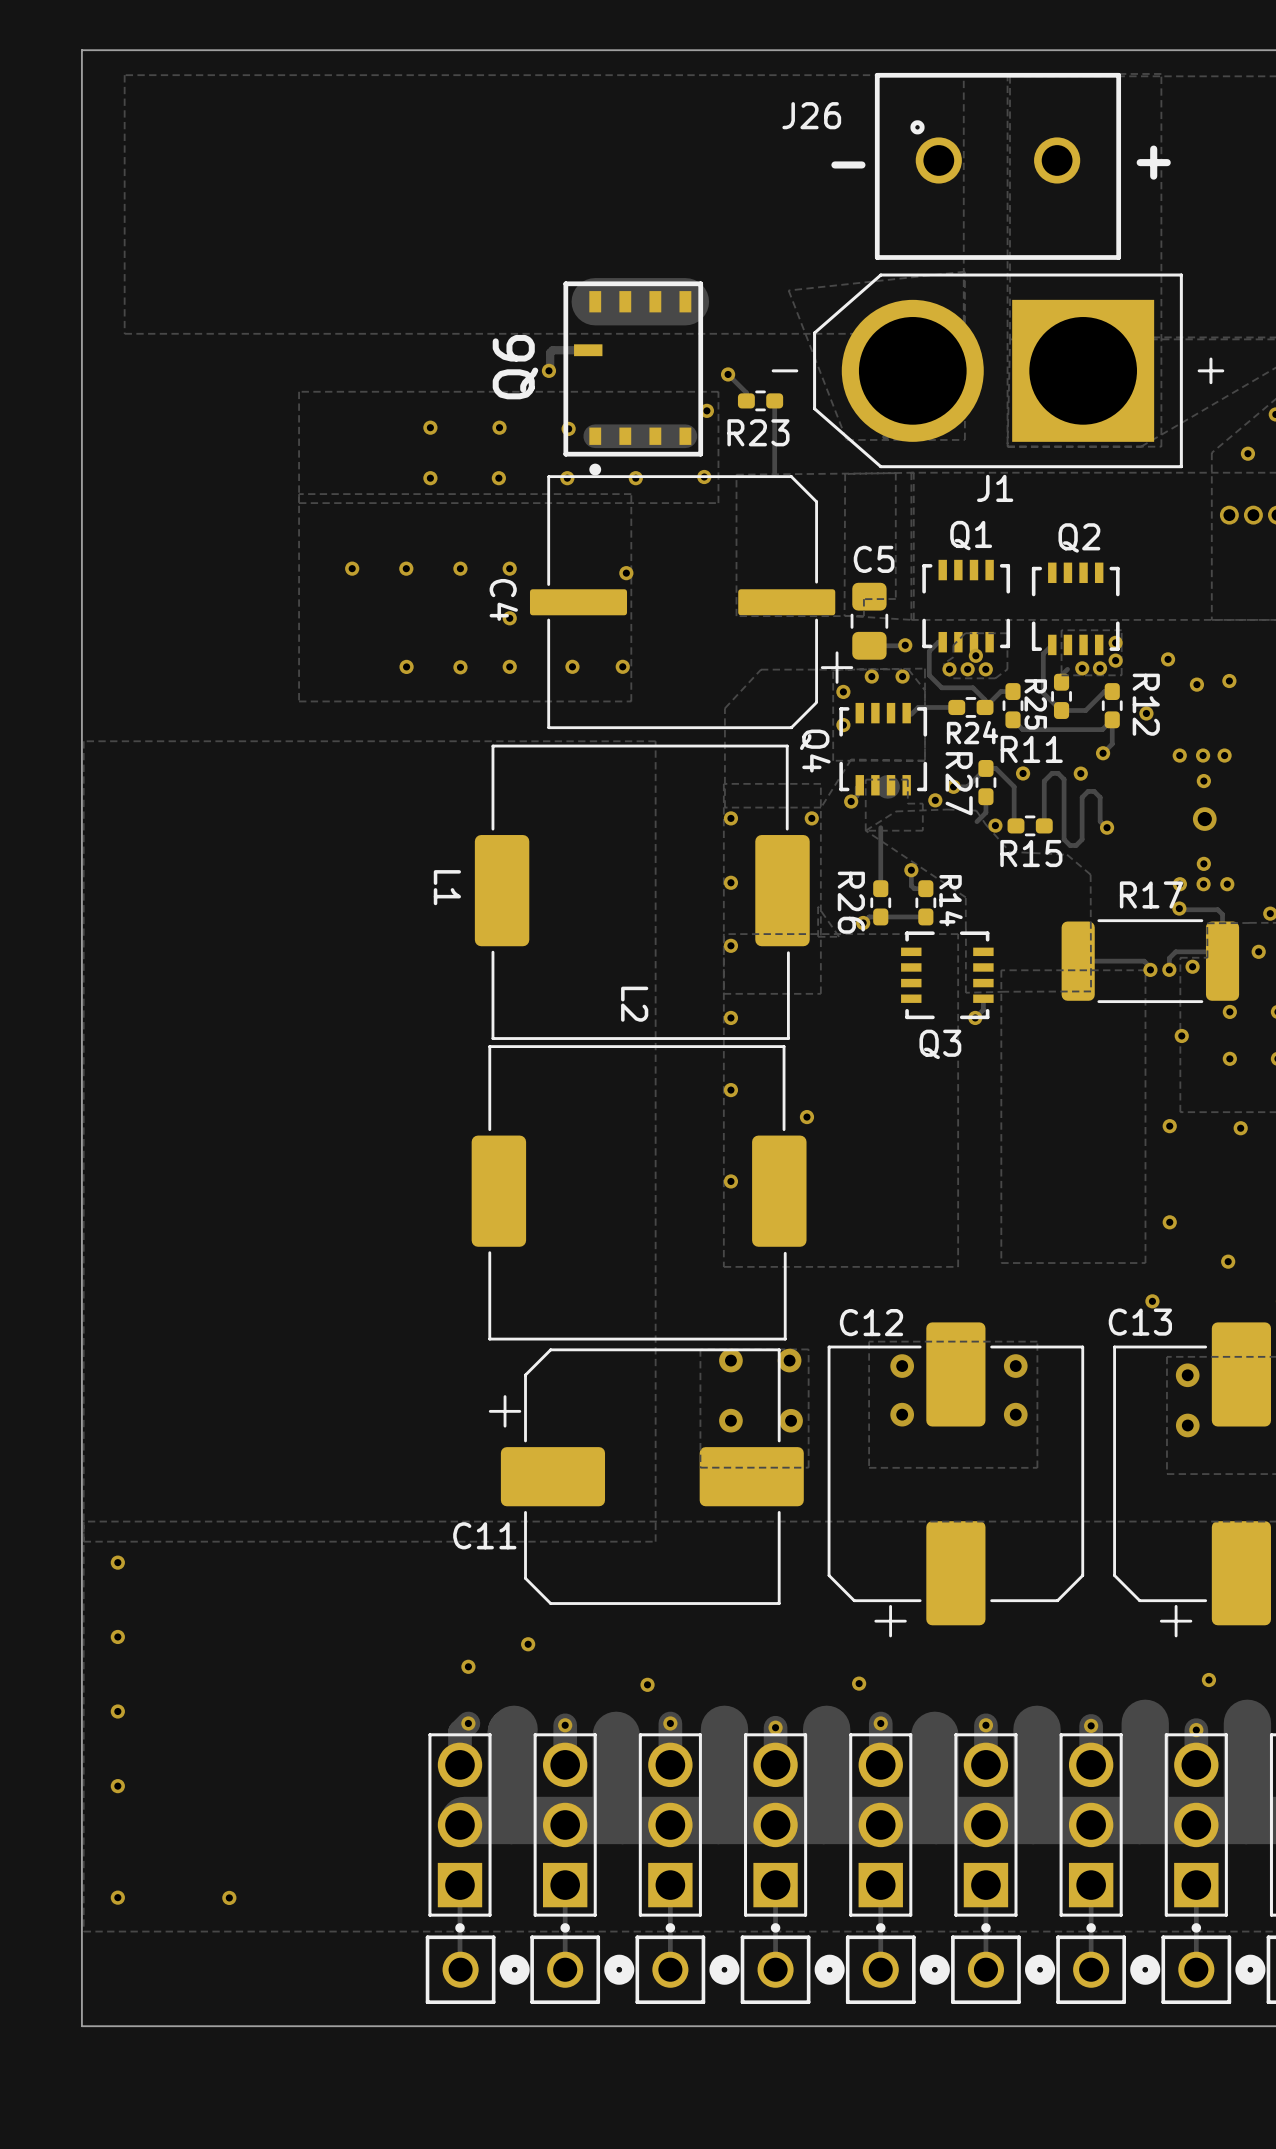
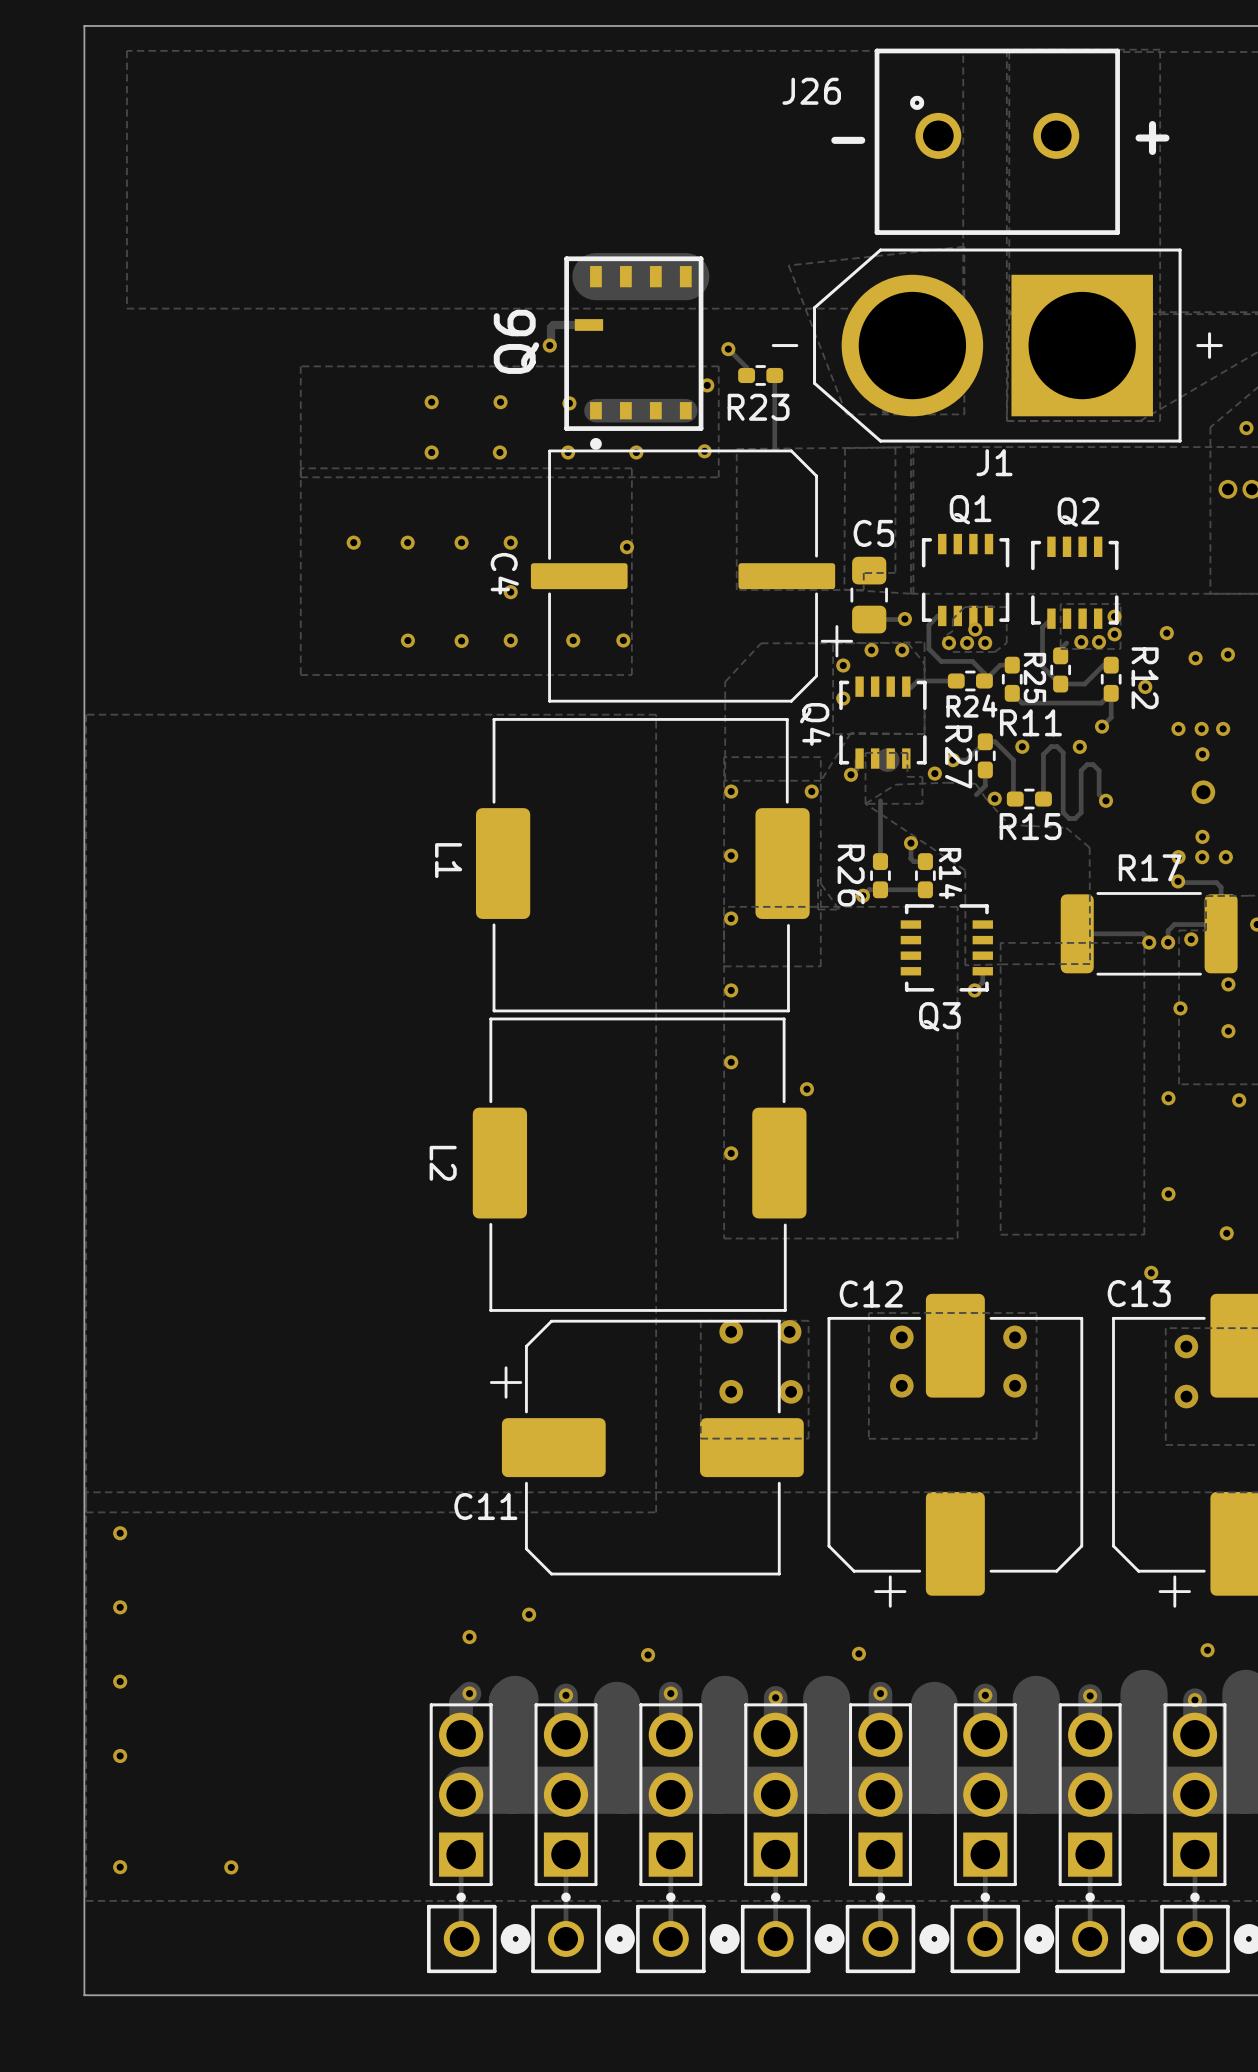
L2 name position: L2 (634, 1004) -> L2 (443, 1163)

